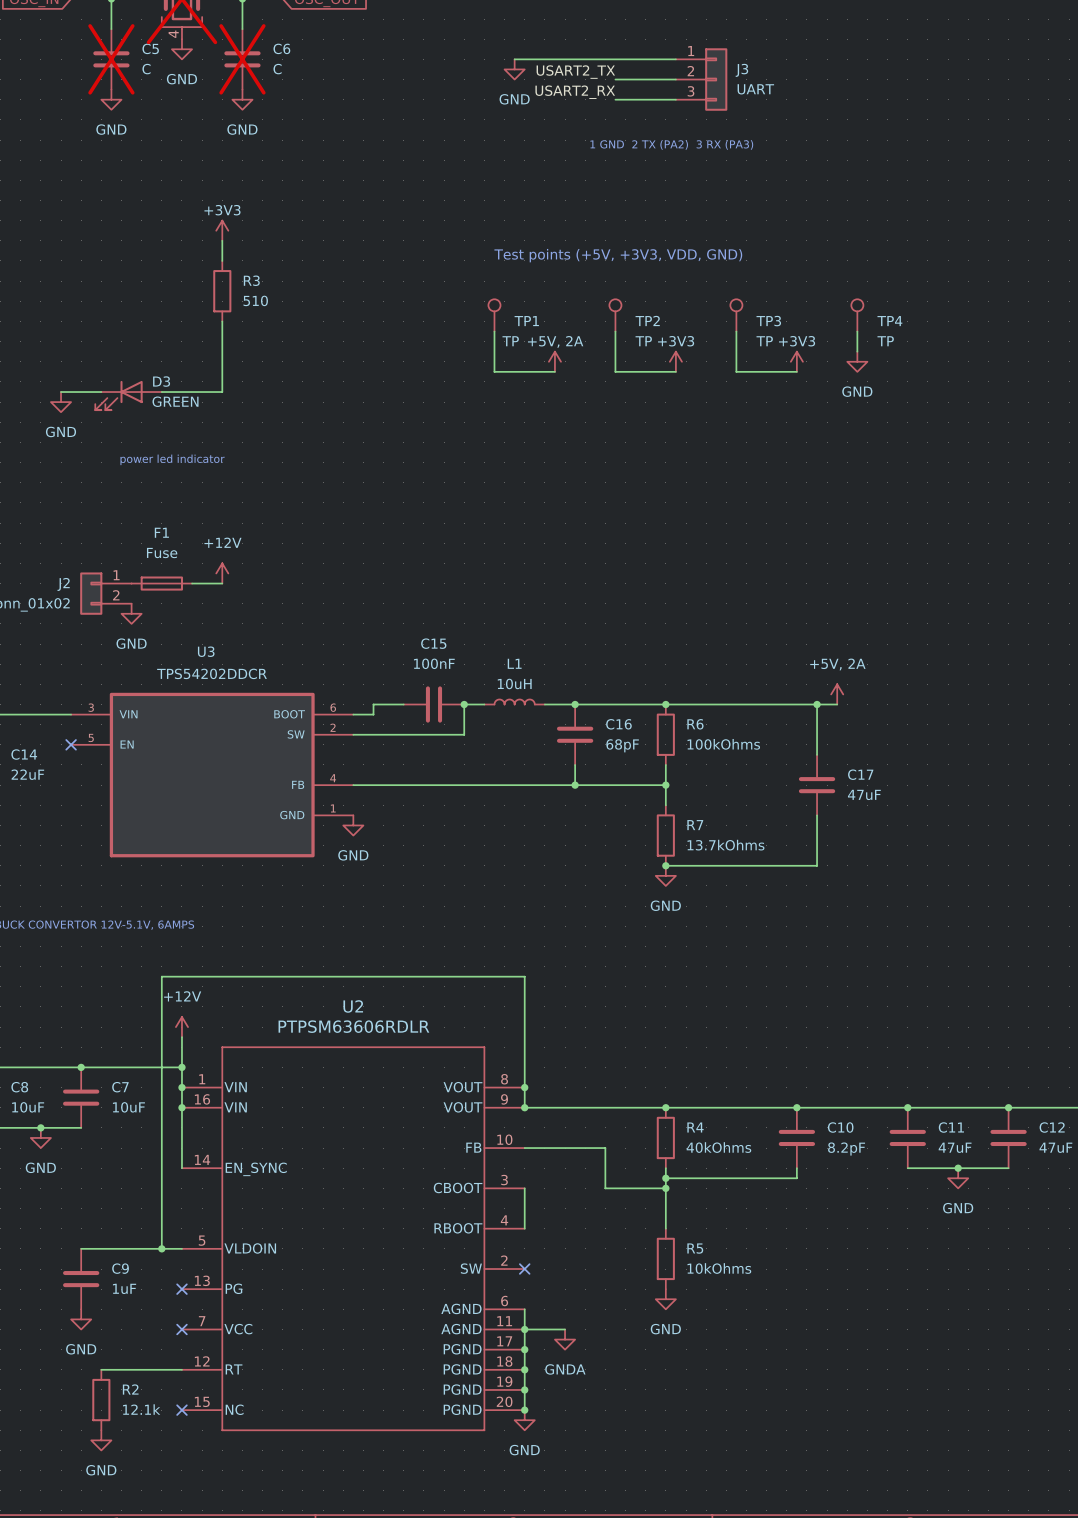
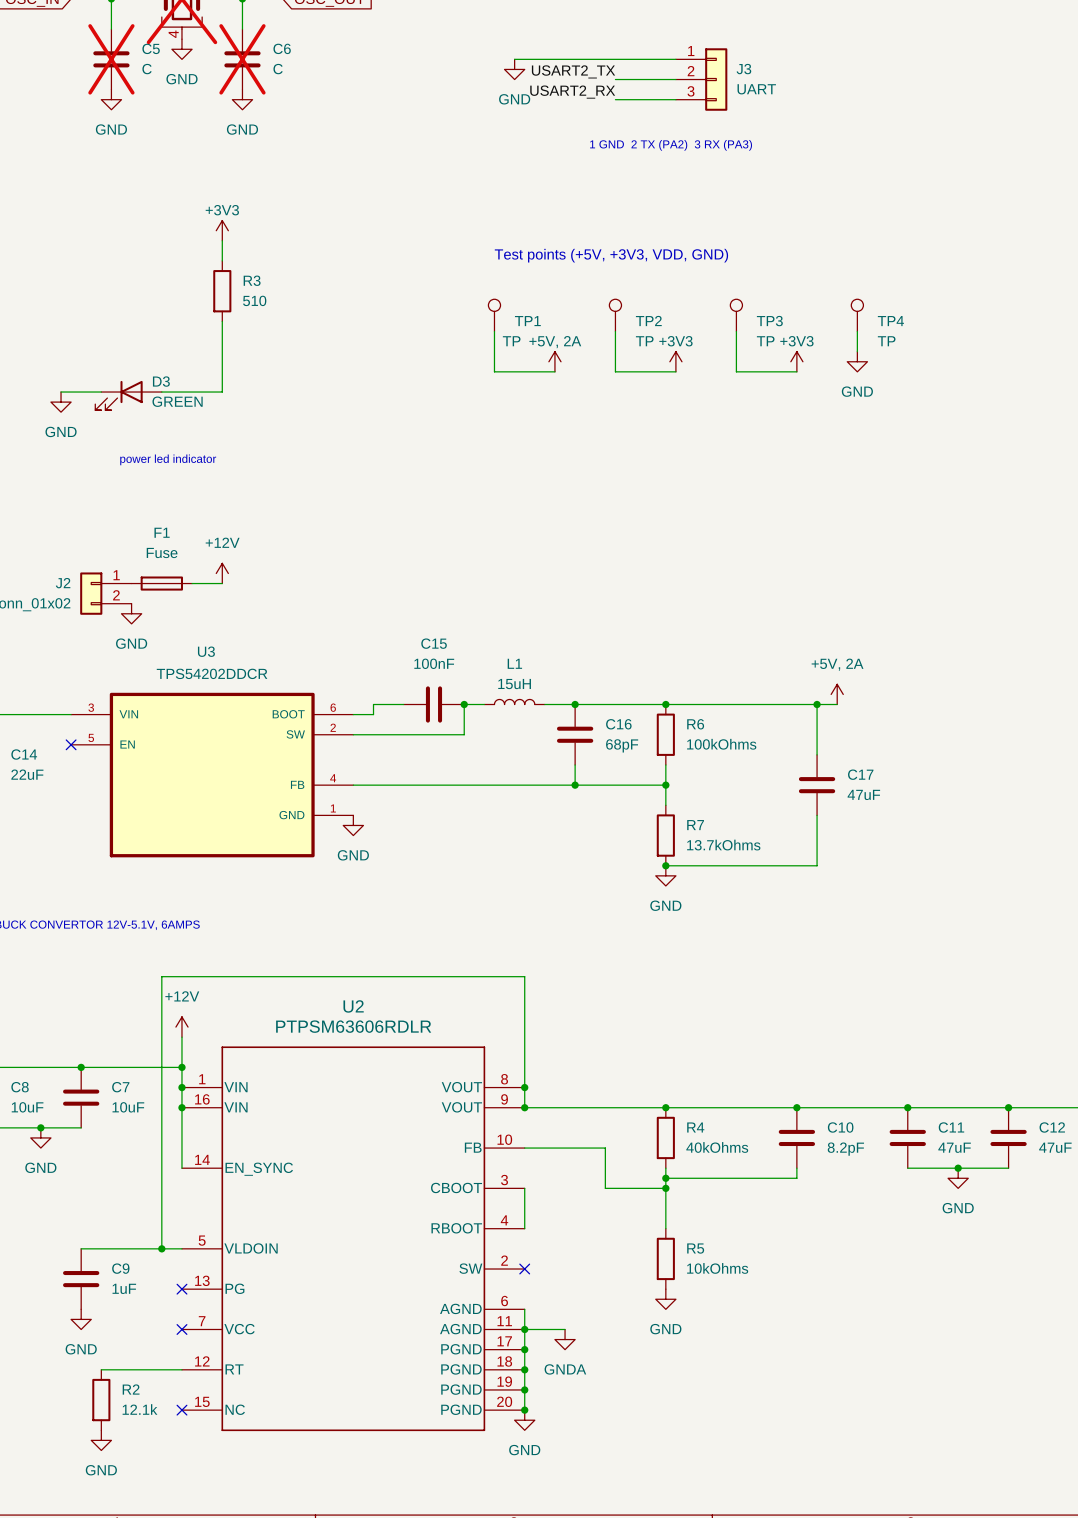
L1 value: 10uH (514, 683) -> 15uH (514, 684)

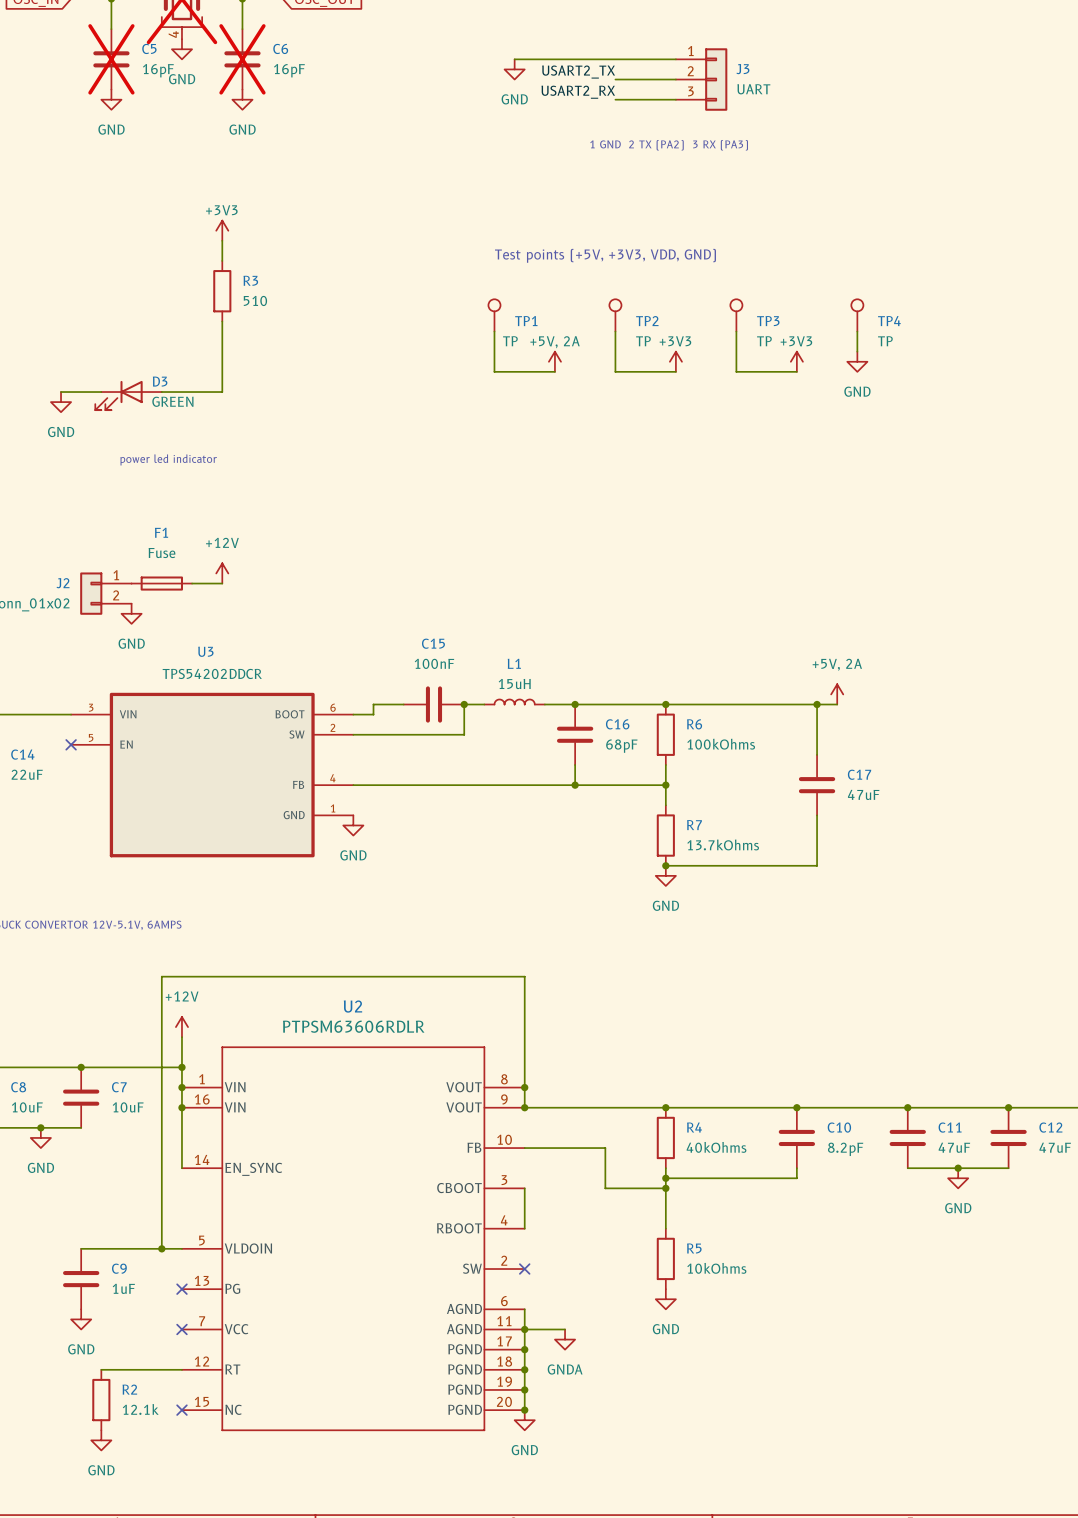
C5 value: C (147, 69) -> 16pF (158, 70)
C6 value: C (278, 69) -> 16pF (289, 70)

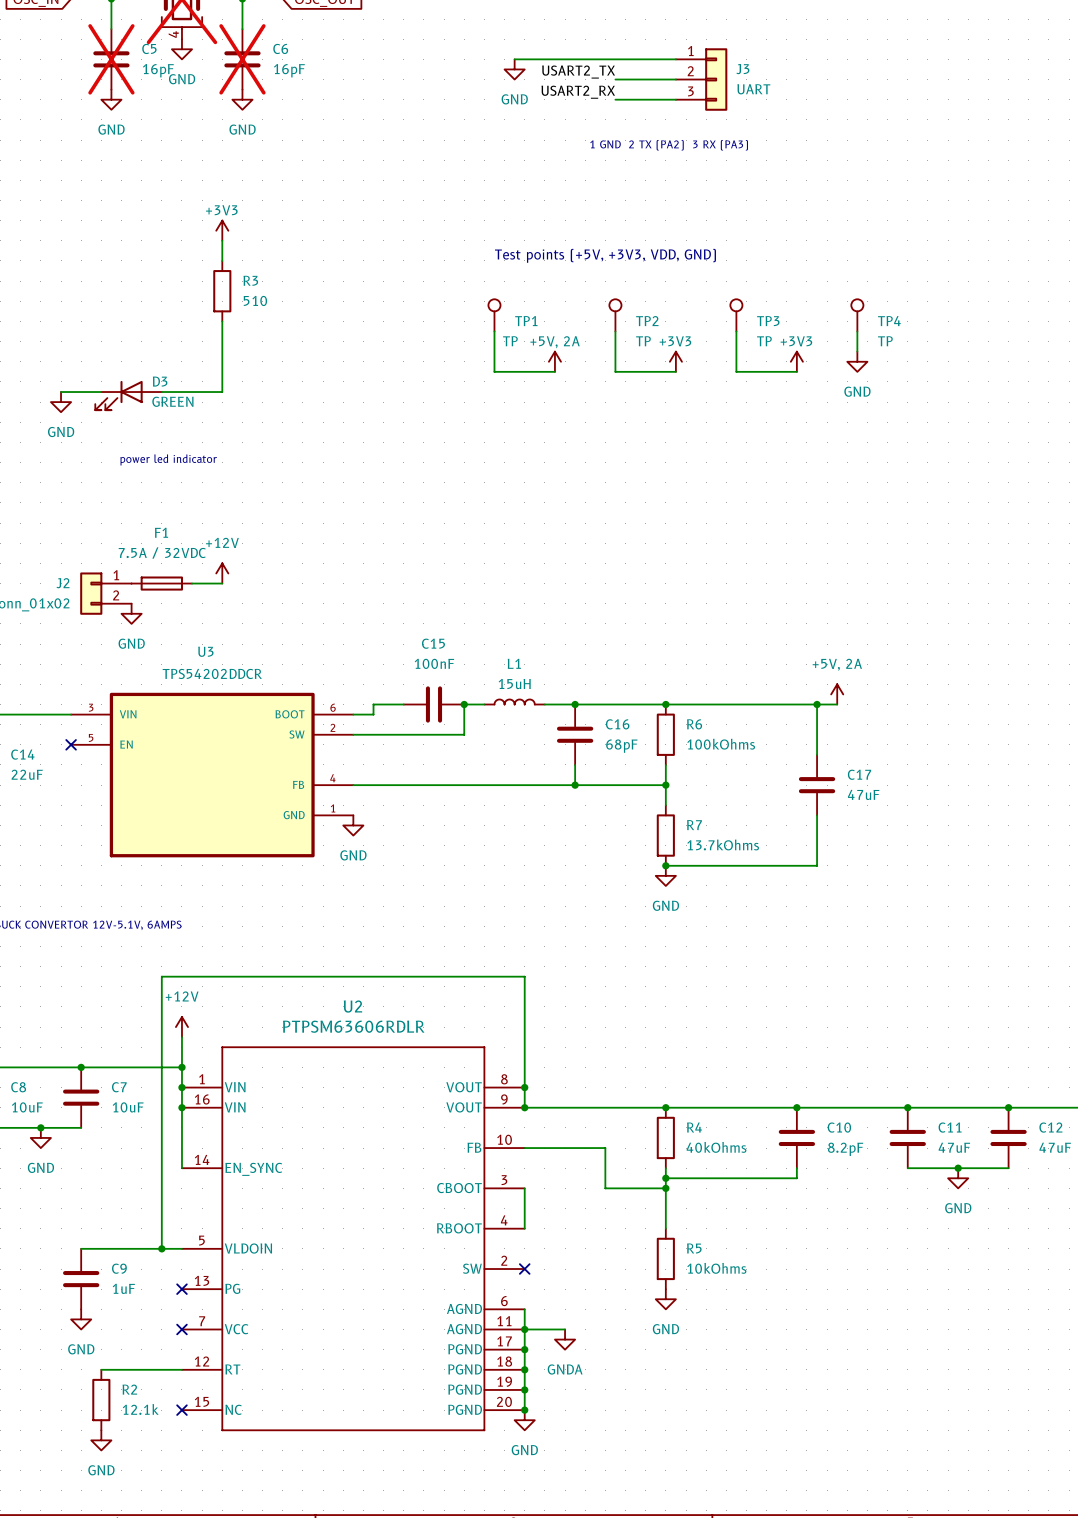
F1 value: Fuse (161, 553) -> 7.5A / 32VDC (162, 552)

